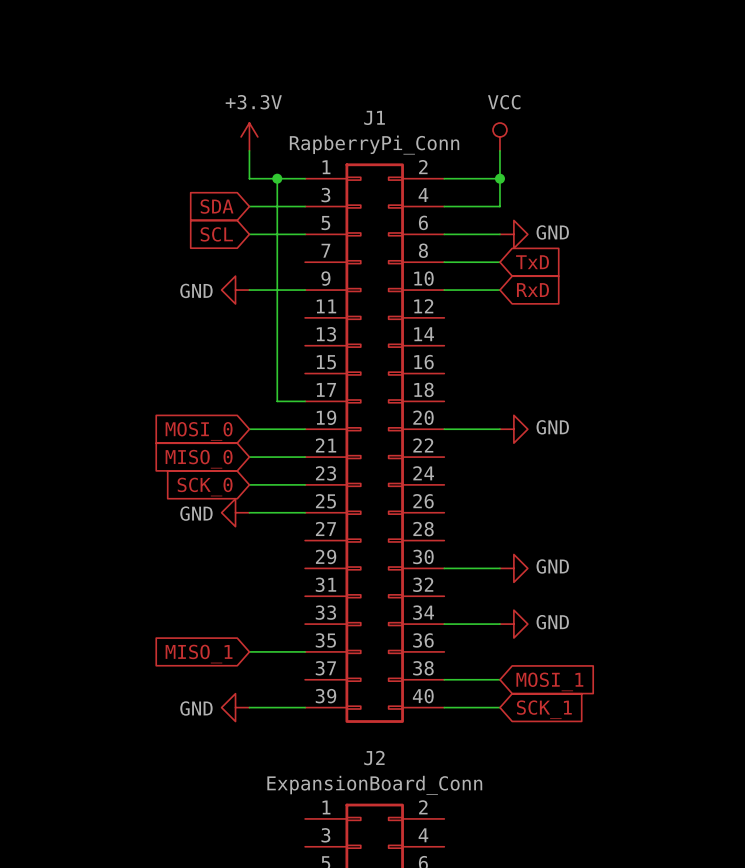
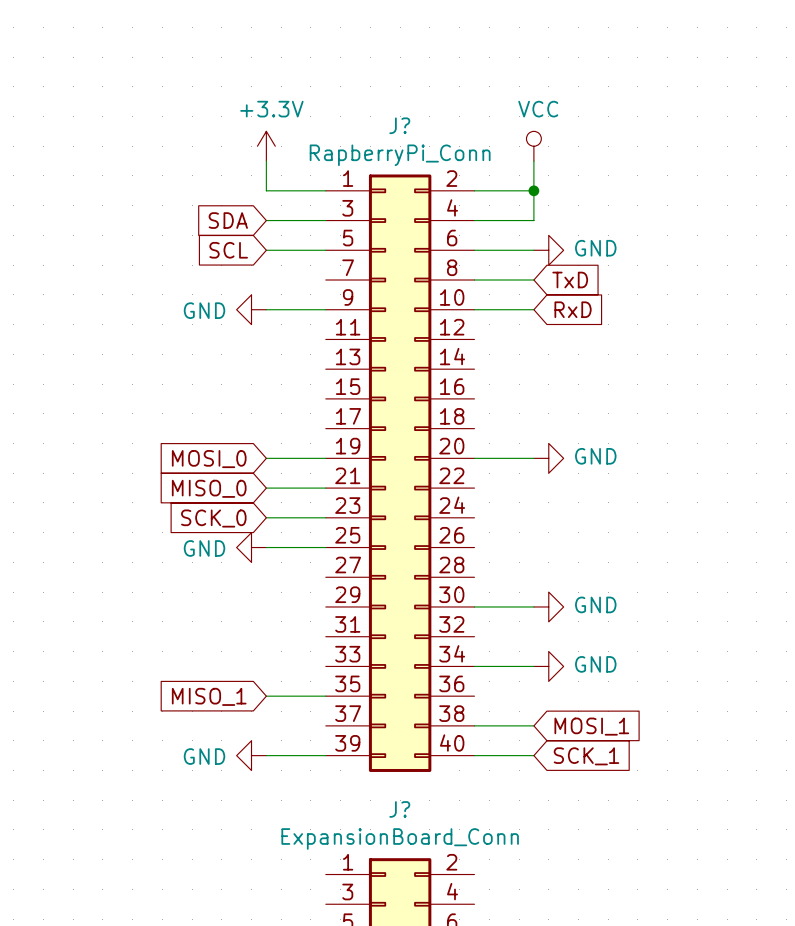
J1 name: J1 (374, 117) -> J? (399, 125)
wire: (277, 178) (277, 401) (305, 401) -> none
junction: (277, 178) -> none
J2 name: J2 (374, 758) -> J? (399, 809)

